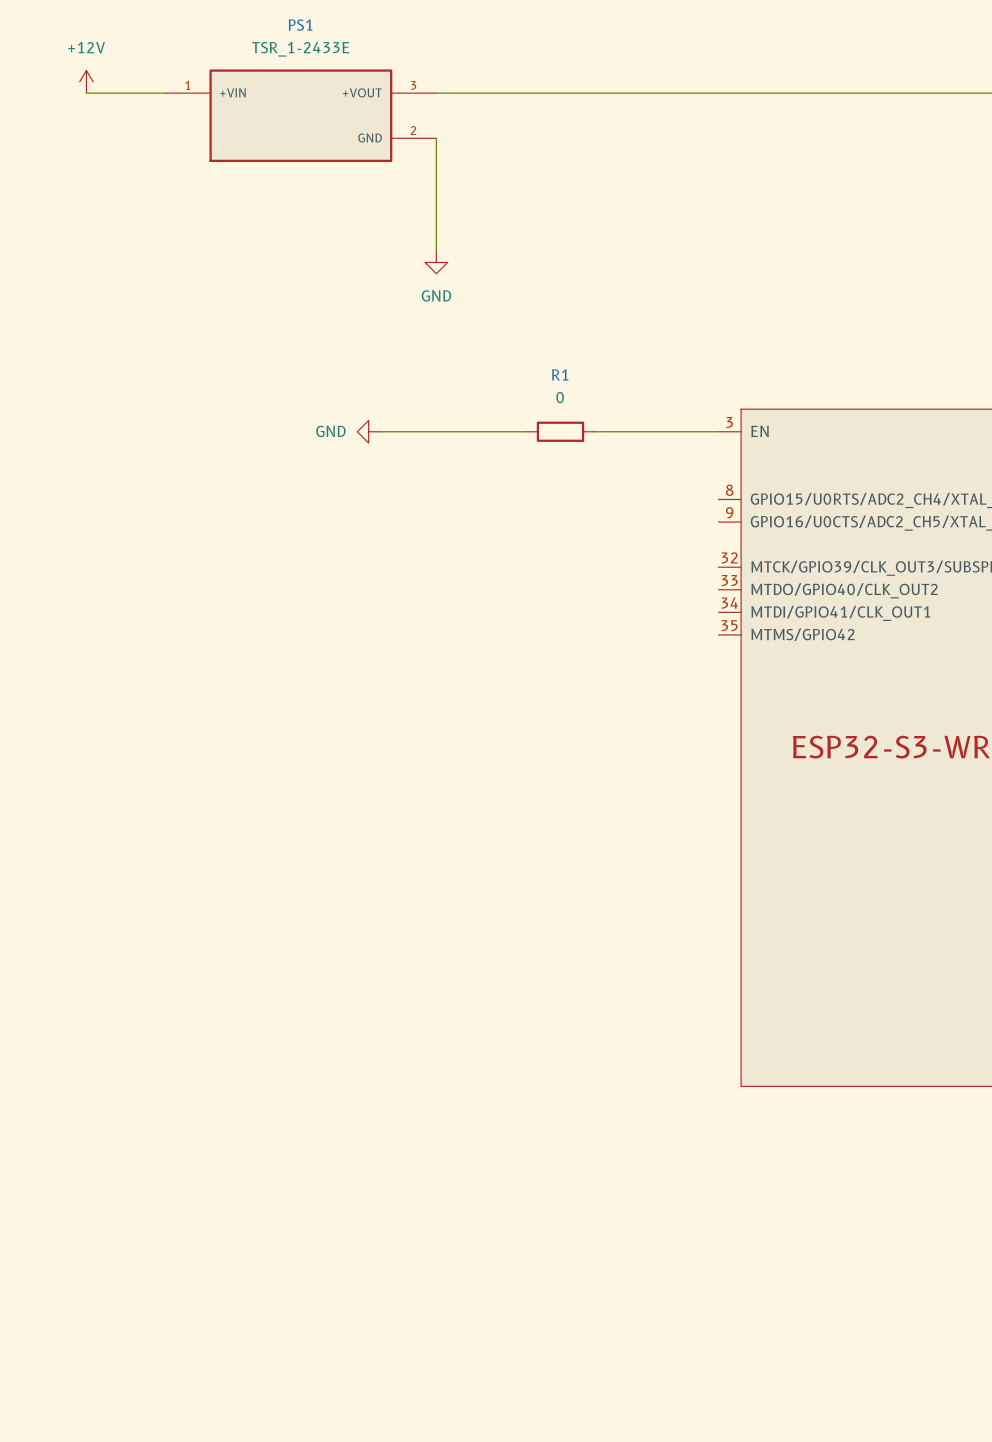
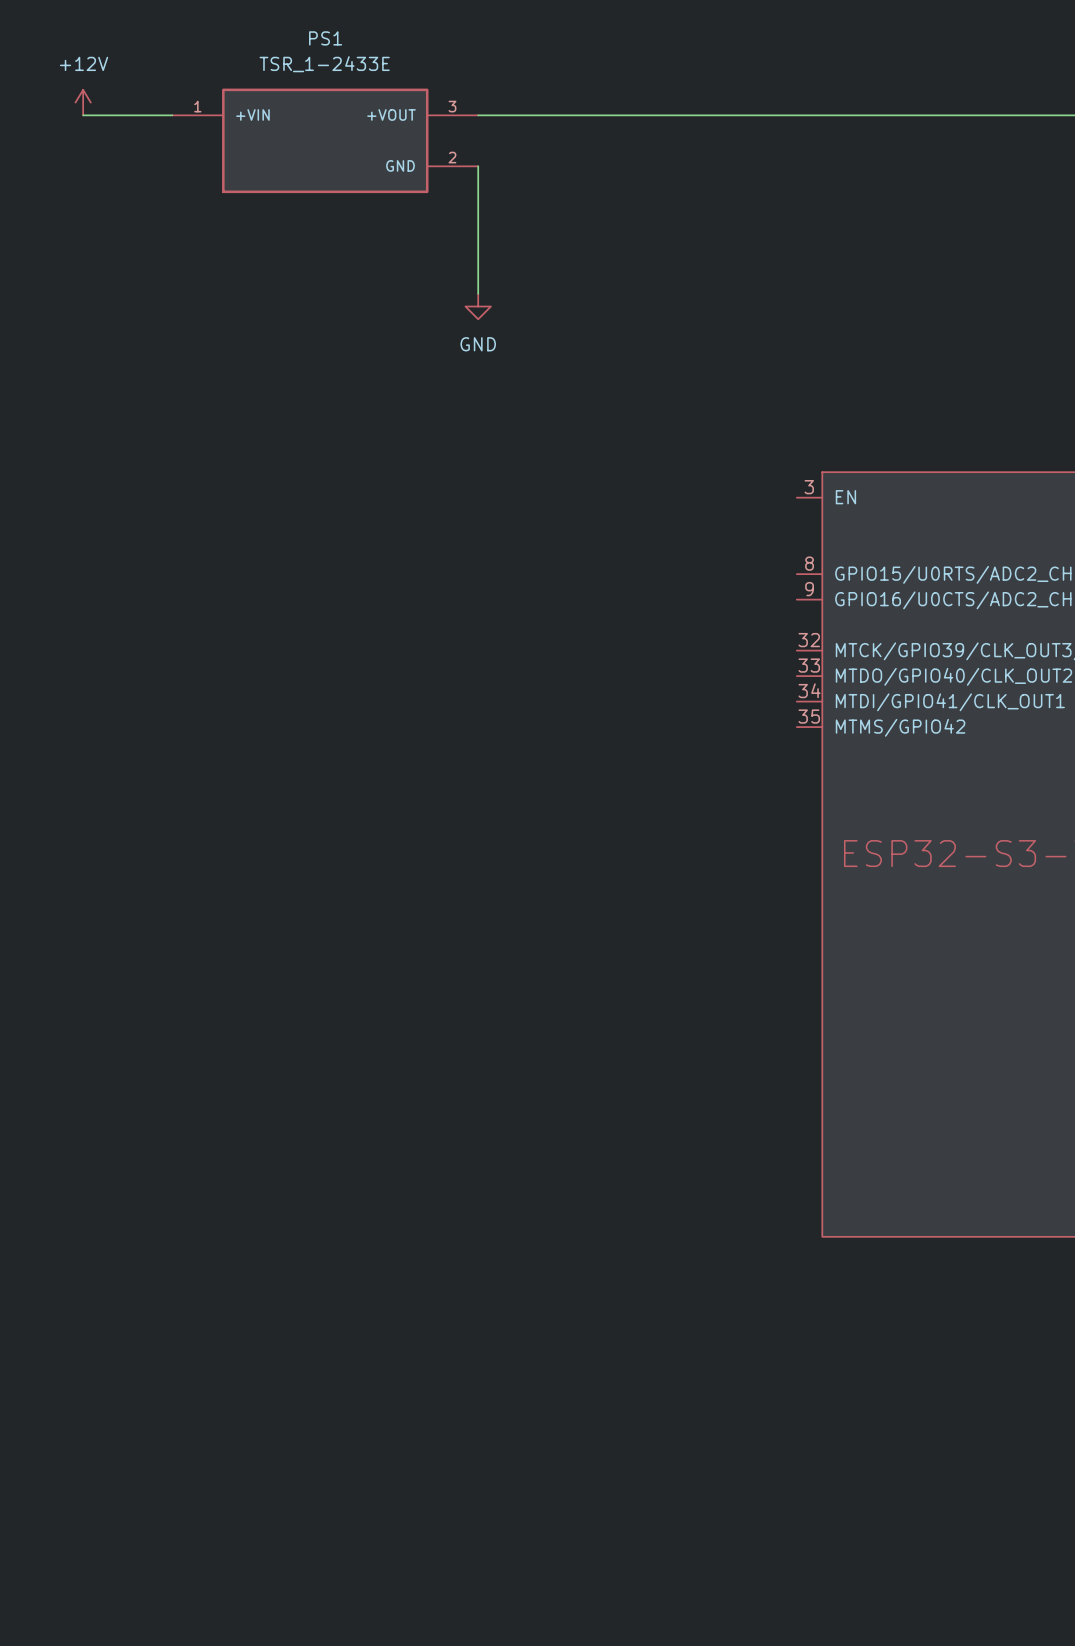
power symbol: GND (368, 431) -> none
wire: (379, 431) (526, 431) -> none
R1: 0 (560, 431) -> none
wire: (594, 431) (718, 431) -> none

